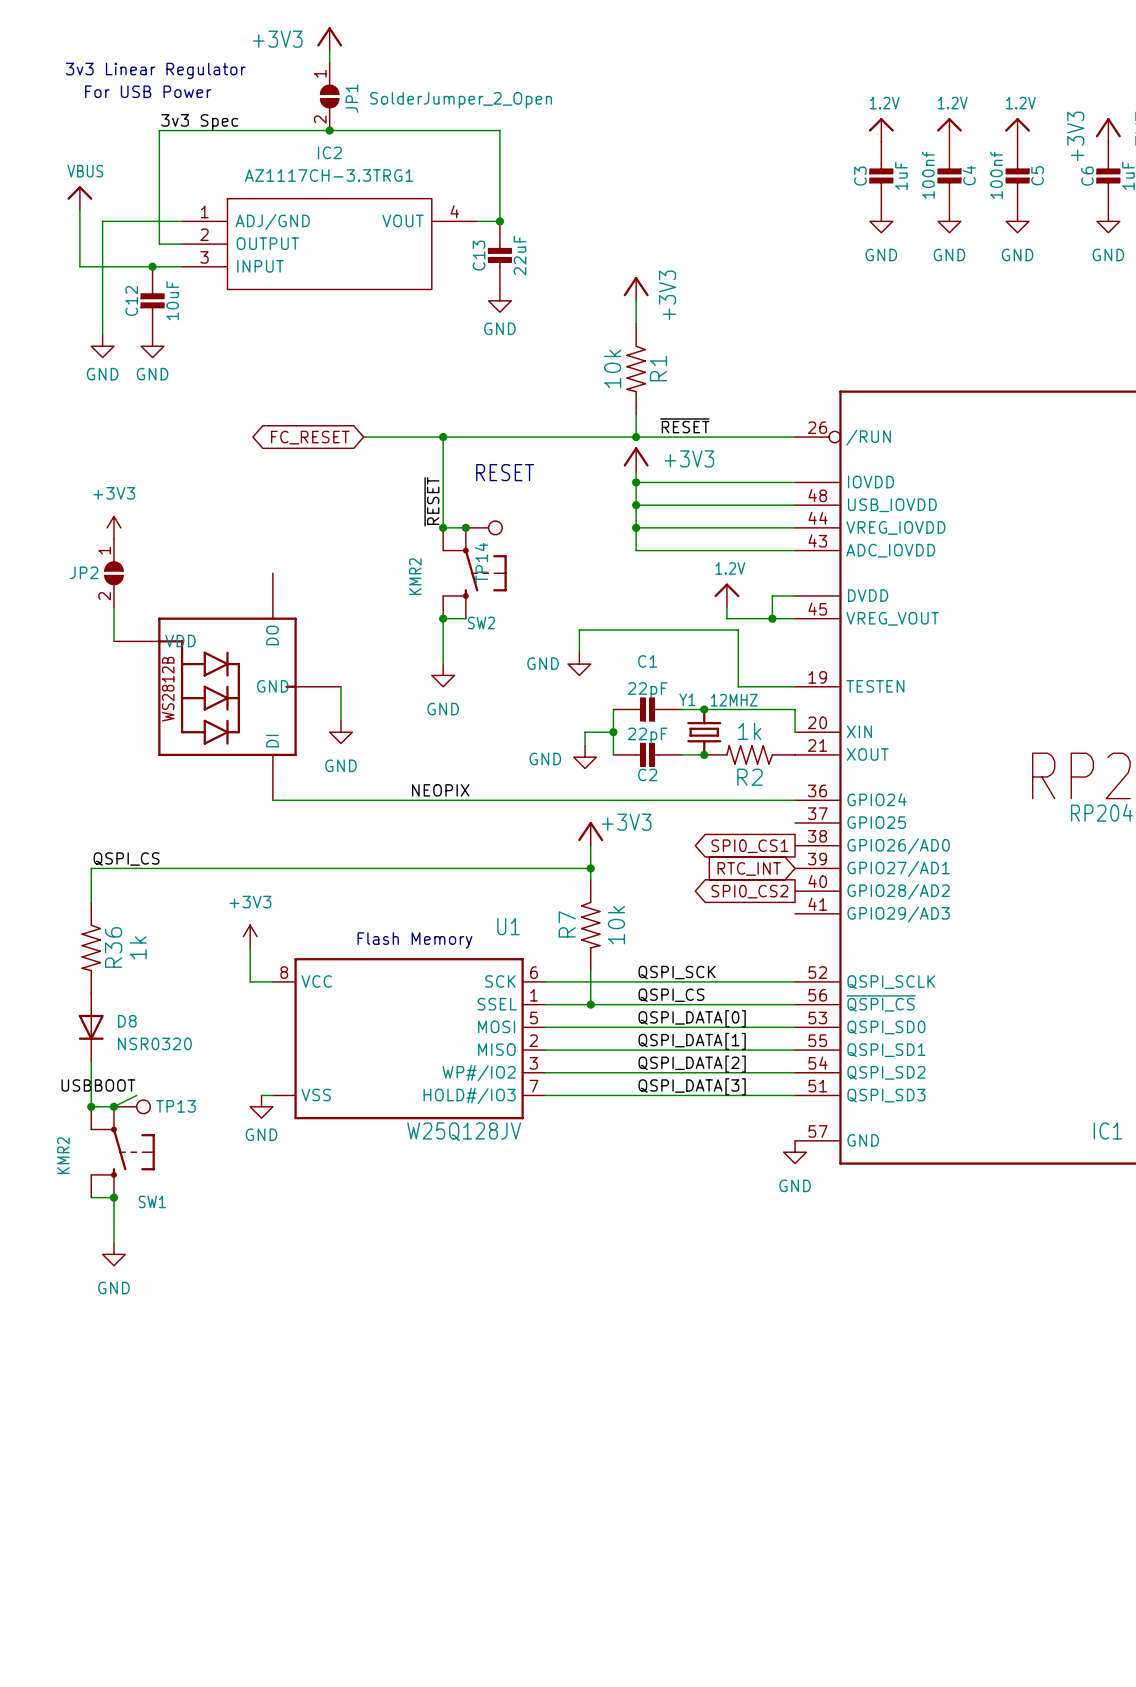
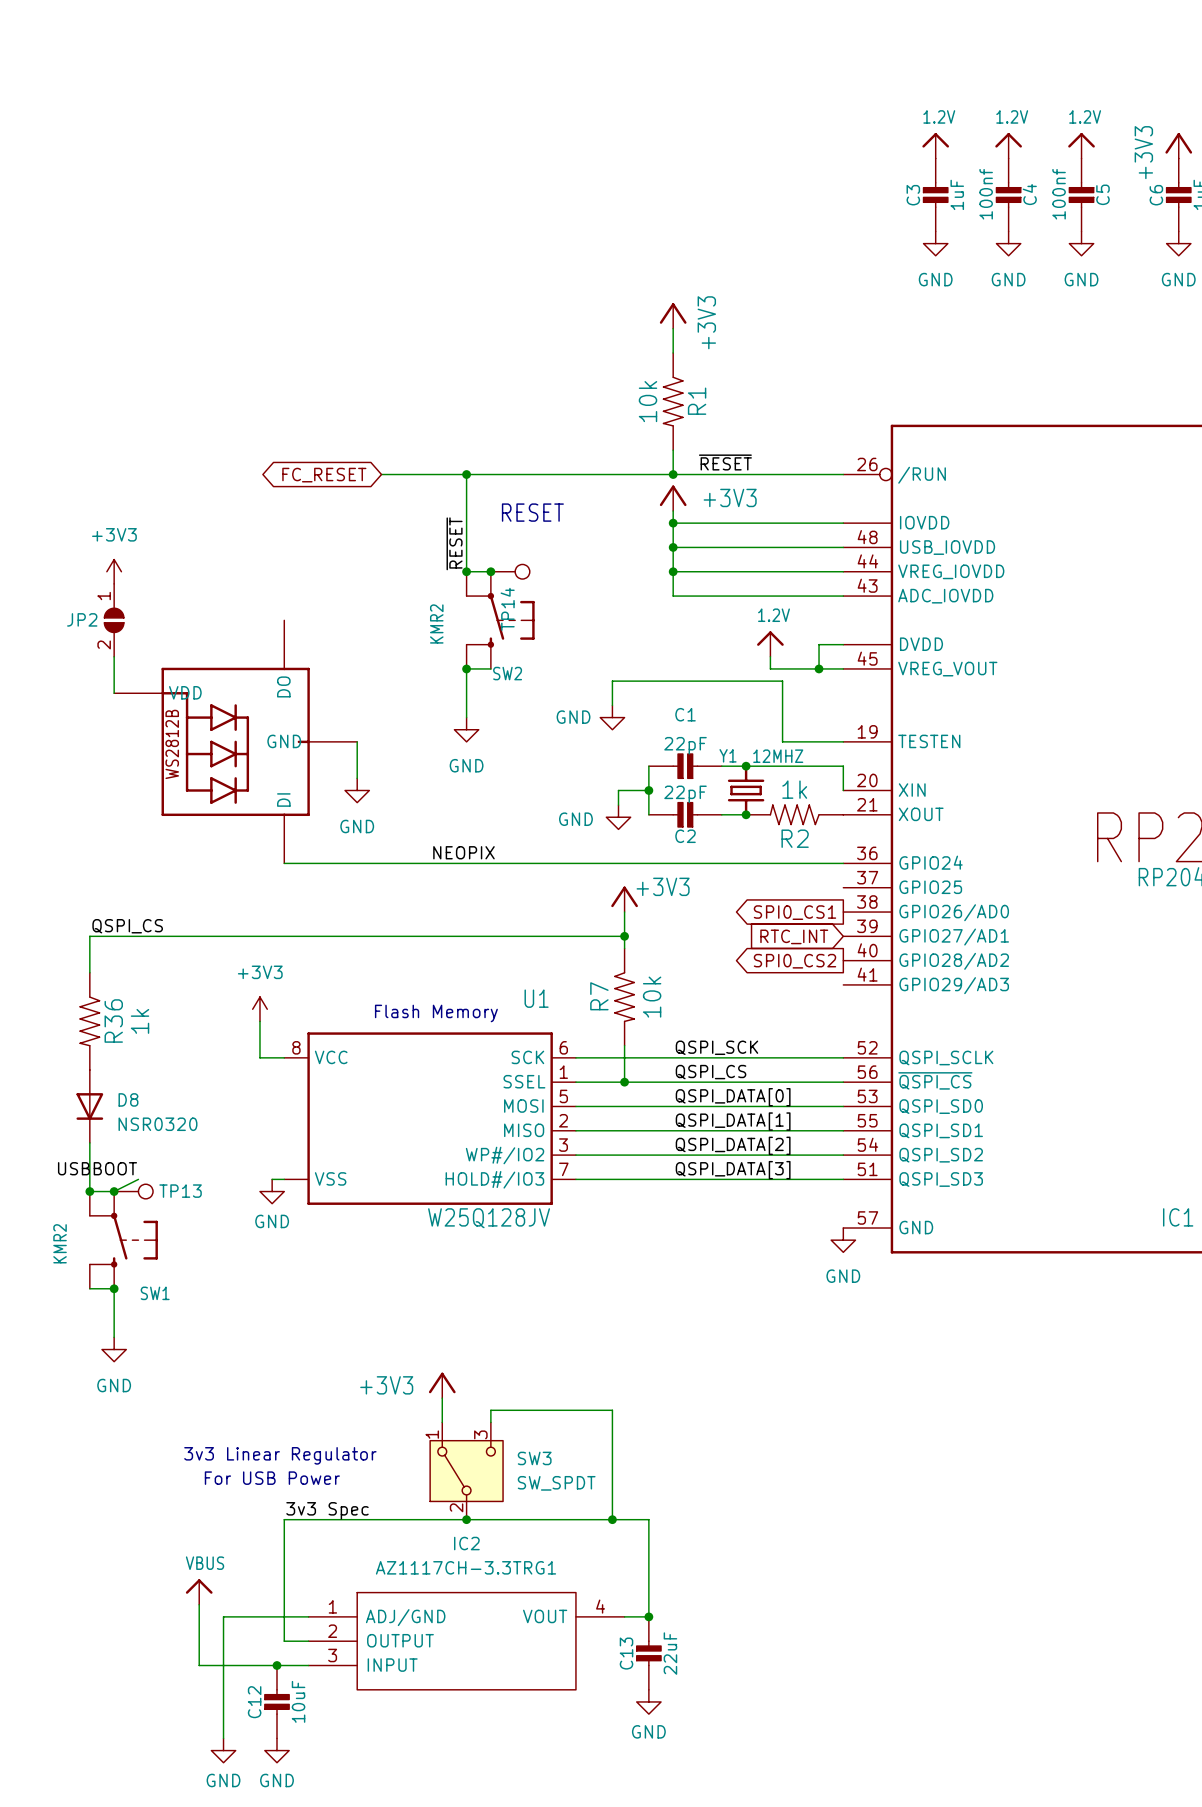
power symbol: +3V3 (329, 39) -> none
wire: (329, 51) (329, 62) -> none
text: 3v3 Linear Regulator (155, 70) -> none
text: For USB Power (148, 91) -> none
JP1: SolderJumper_2_Open (329, 96) -> none
label: 3v3 Spec (199, 122) -> none
junction: (329, 130) -> none
power symbol: VBUS (79, 198) -> none
wire: (79, 210) (79, 266) (182, 266) -> none
wire: (182, 221) (102, 221) (102, 334) -> none
wire: (477, 221) (499, 221) (499, 130) (159, 130) (159, 244) (182, 244) -> none
junction: (499, 221) -> none
IC2 position: (329, 244) -> (466, 1641)
C13 position: (499, 255) -> (648, 1653)
junction: (152, 266) -> none
C12 position: (152, 300) -> (276, 1701)
power symbol: GND (499, 300) -> none
power symbol: GND (102, 346) -> none
power symbol: GND (152, 346) -> none
power symbol: none -> +3V3 (442, 1385)
wire: none -> (442, 1398) (442, 1422)
wire: none -> (490, 1422) (490, 1410) (612, 1410) (612, 1519)
text: none -> 3v3 Linear Regulator (280, 1455)
SW3: none -> SW_SPDT (466, 1471)
text: none -> For USB Power (272, 1478)
label: none -> 3v3 Spec (327, 1510)
junction: none -> (466, 1519)
junction: none -> (612, 1519)
power symbol: none -> VBUS (199, 1591)
wire: none -> (199, 1604) (199, 1665) (308, 1665)
wire: none -> (308, 1616) (223, 1616) (223, 1738)
wire: none -> (624, 1616) (648, 1616) (648, 1519) (284, 1519) (284, 1641) (308, 1641)
junction: none -> (648, 1616)
junction: none -> (276, 1665)
power symbol: none -> GND (648, 1701)
power symbol: none -> GND (223, 1750)
power symbol: none -> GND (276, 1750)

